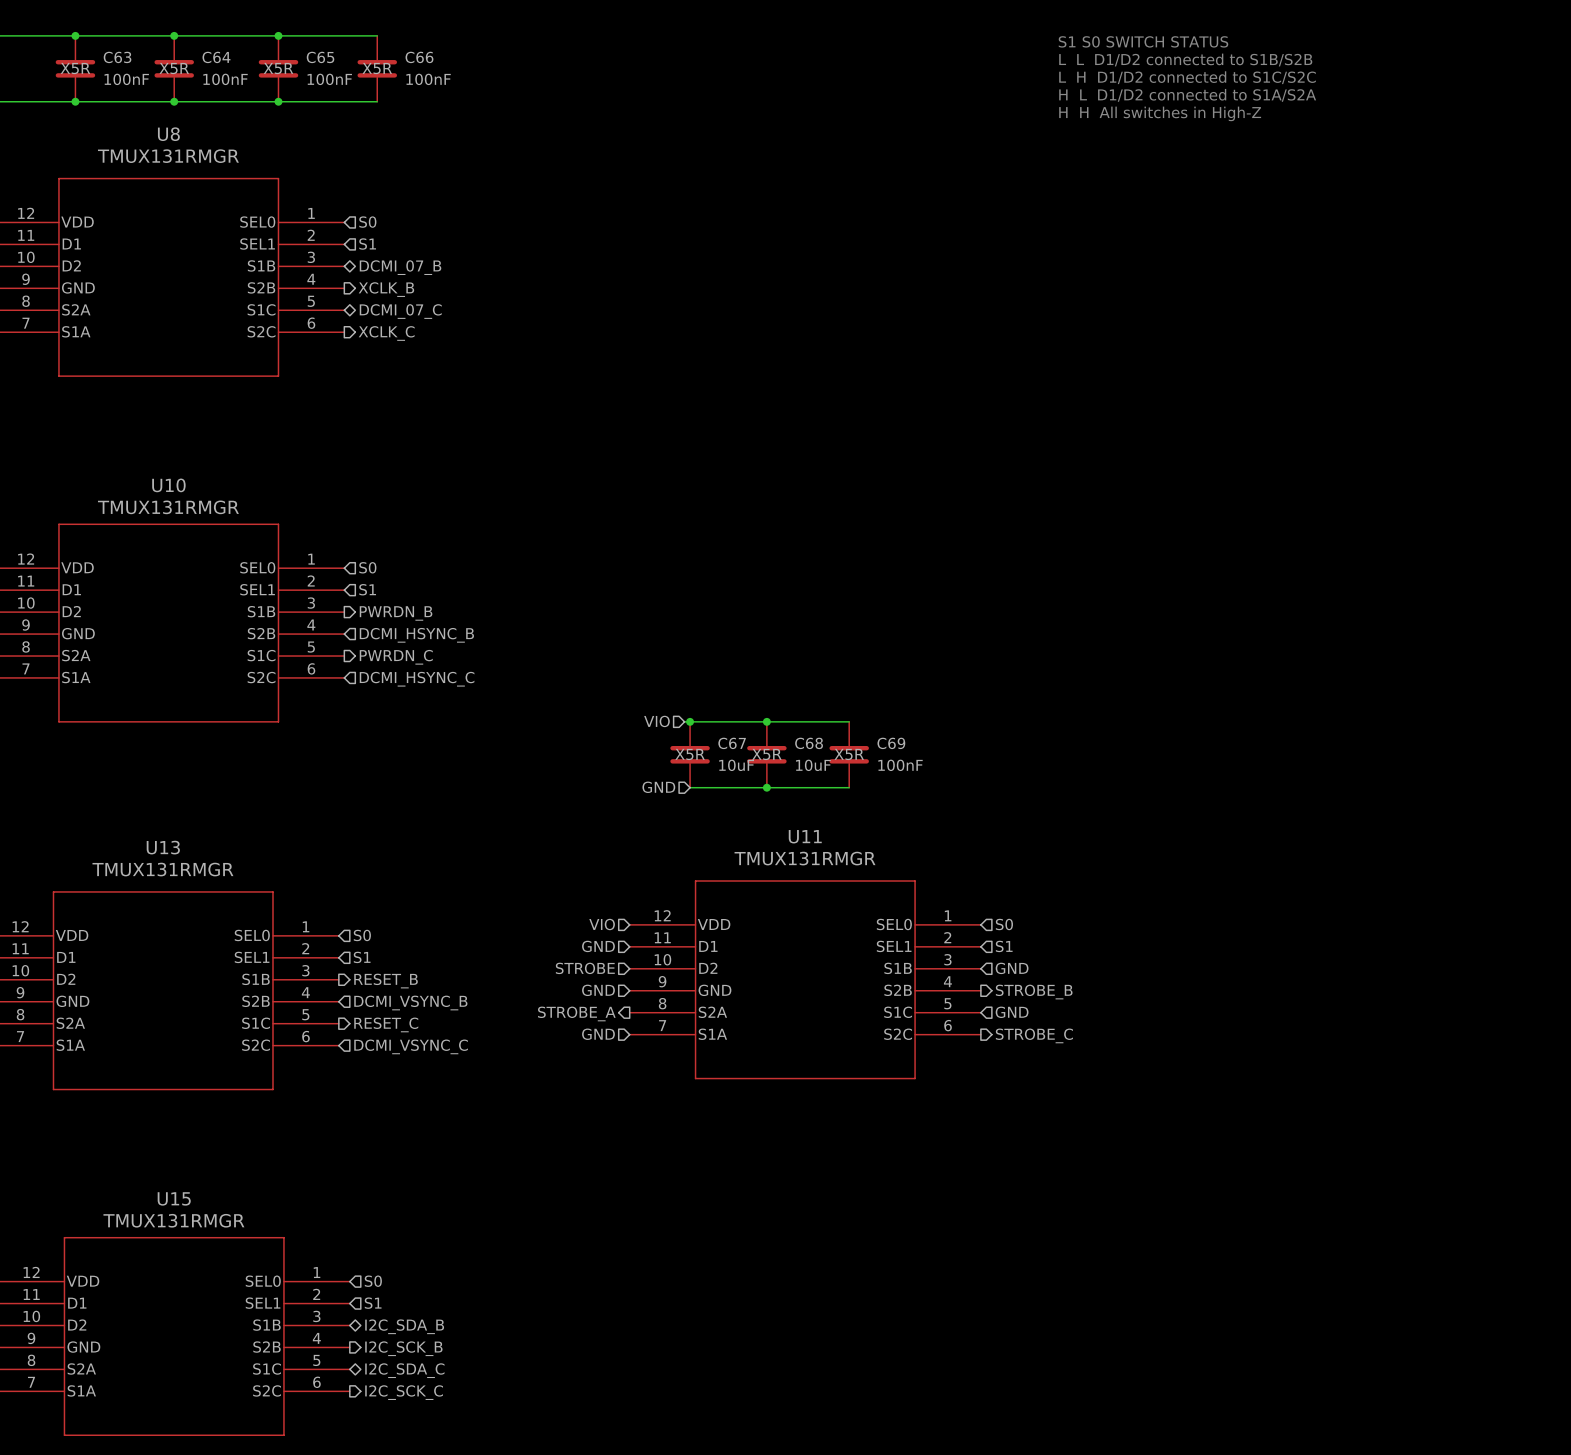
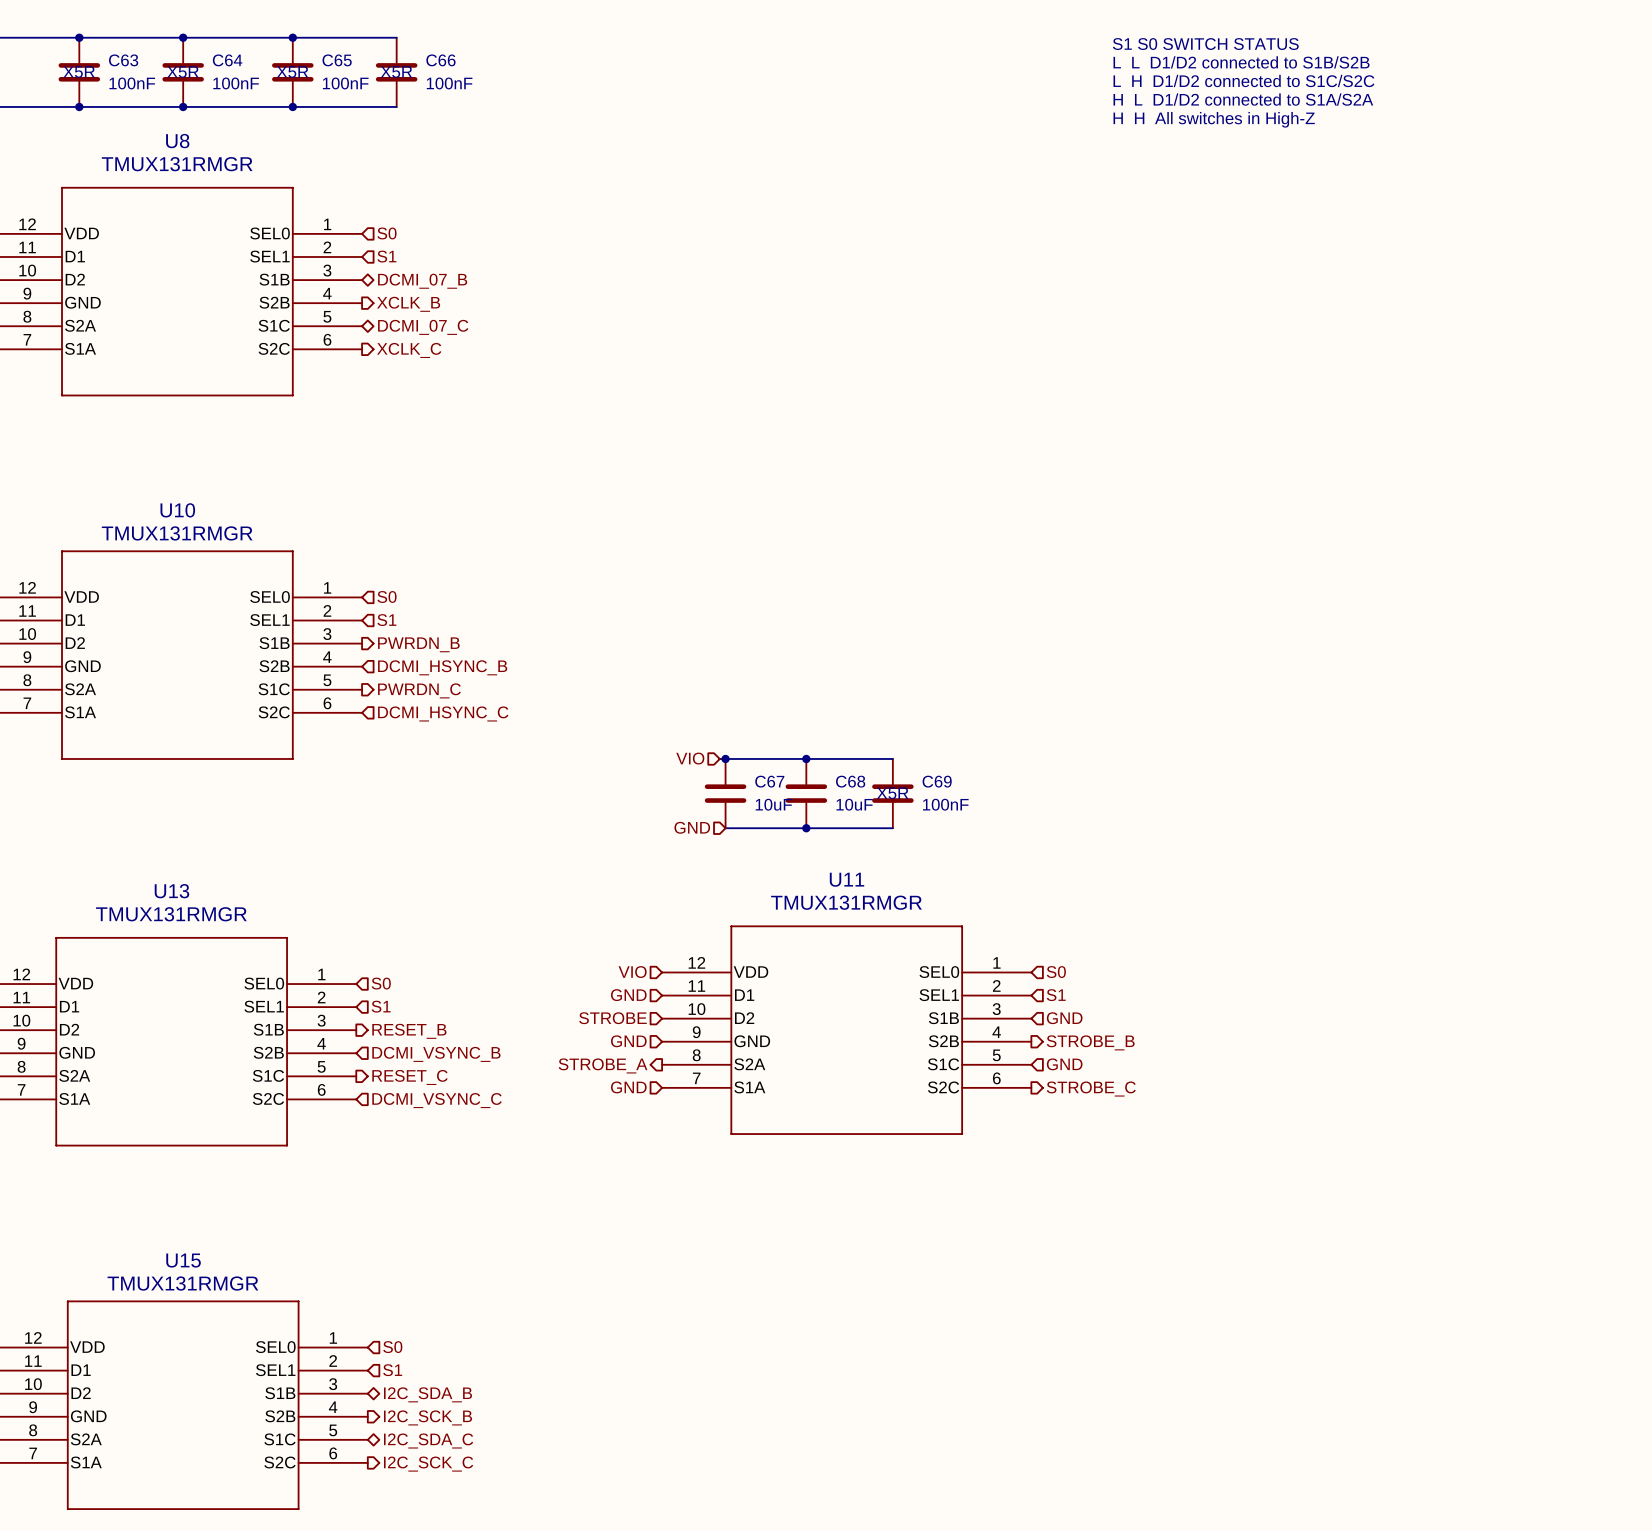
C67 text: X5R (690, 754) -> none
C68 text: X5R (766, 754) -> none

